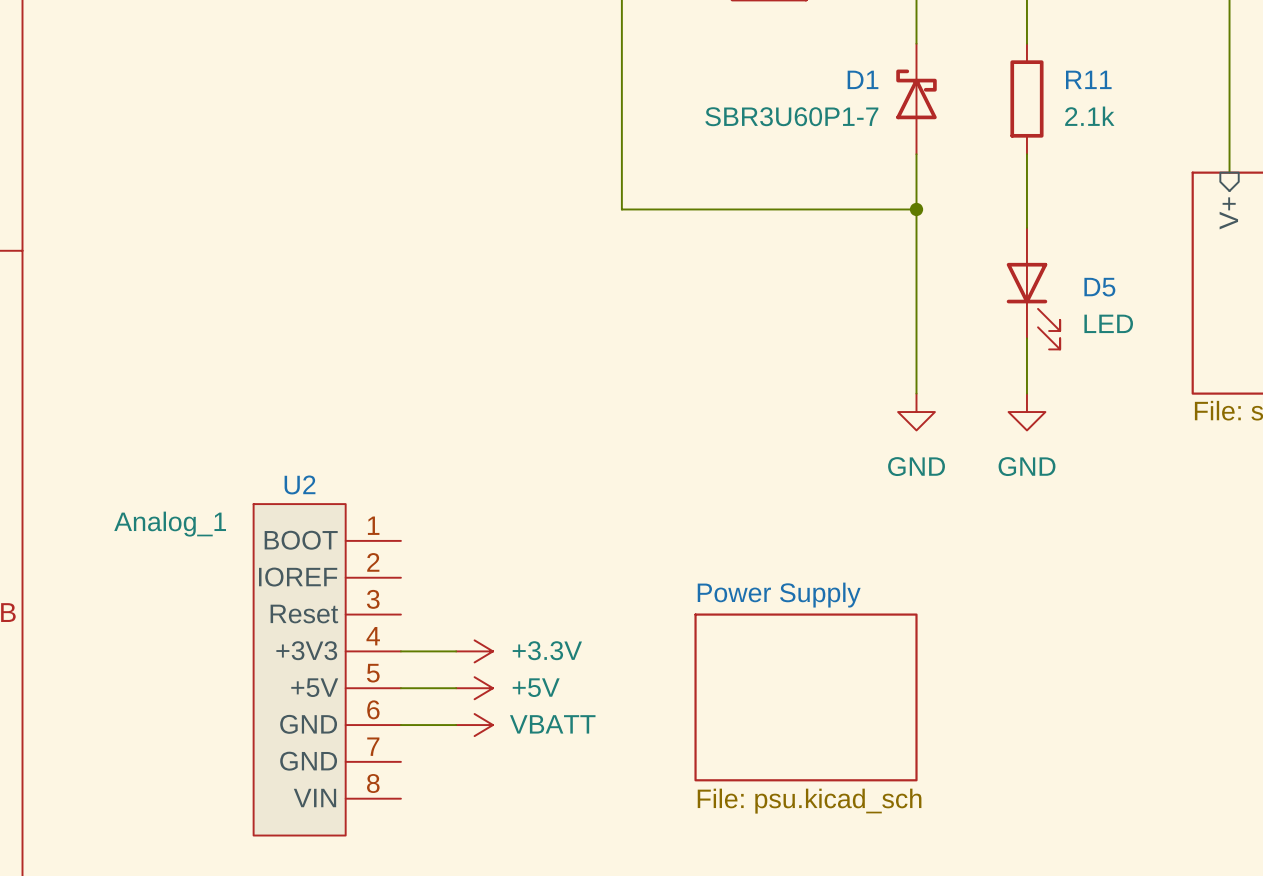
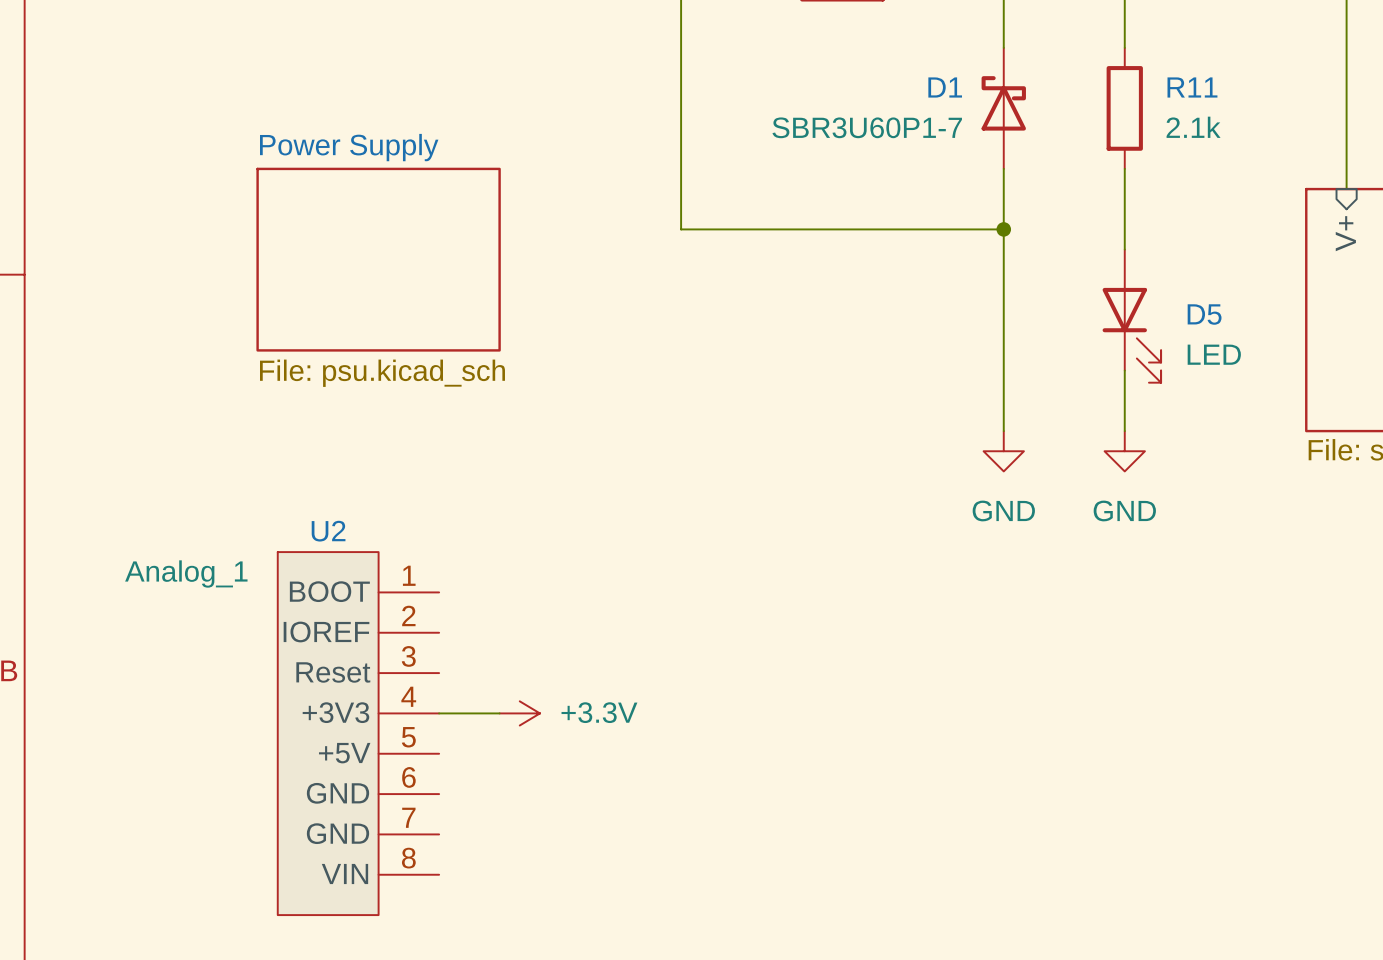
sheet Power Supply: none -> File: psu.kicad_sch (378, 259)
wire: (400, 688) (456, 688) -> none
power symbol: +5V (474, 688) -> none
sheet Power Supply: File: psu.kicad_sch (806, 697) -> none
wire: (400, 725) (456, 725) -> none
power symbol: VBATT (474, 725) -> none

